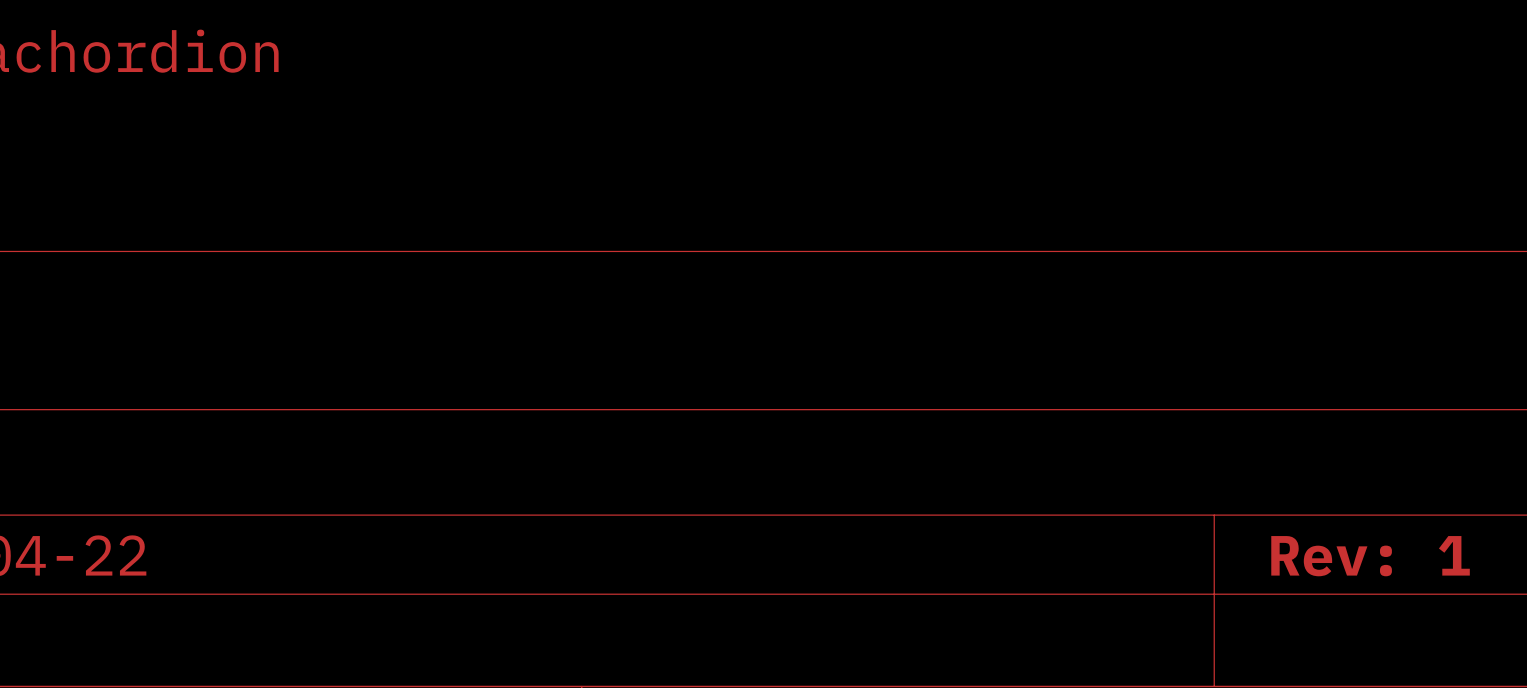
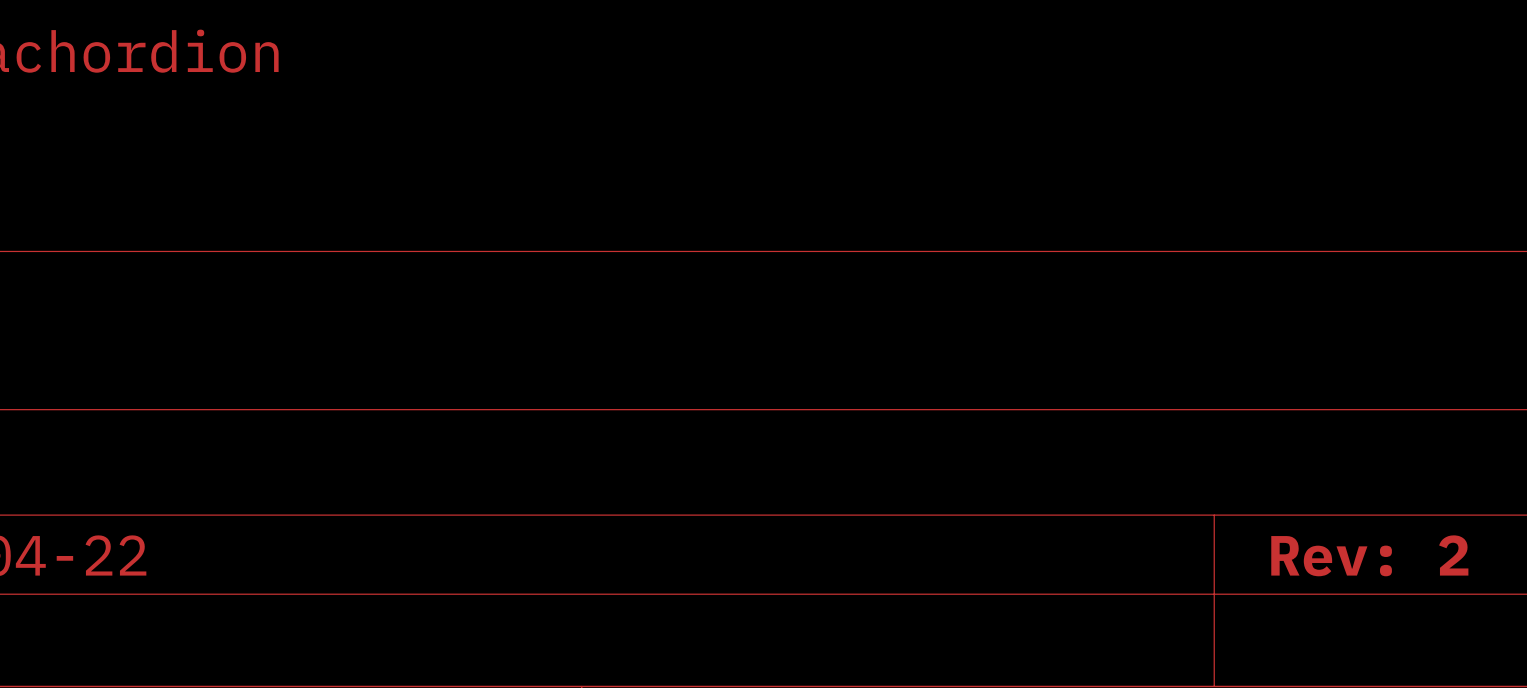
title block: Rev: 1 (1370, 556) -> Rev: 2 (1369, 555)

